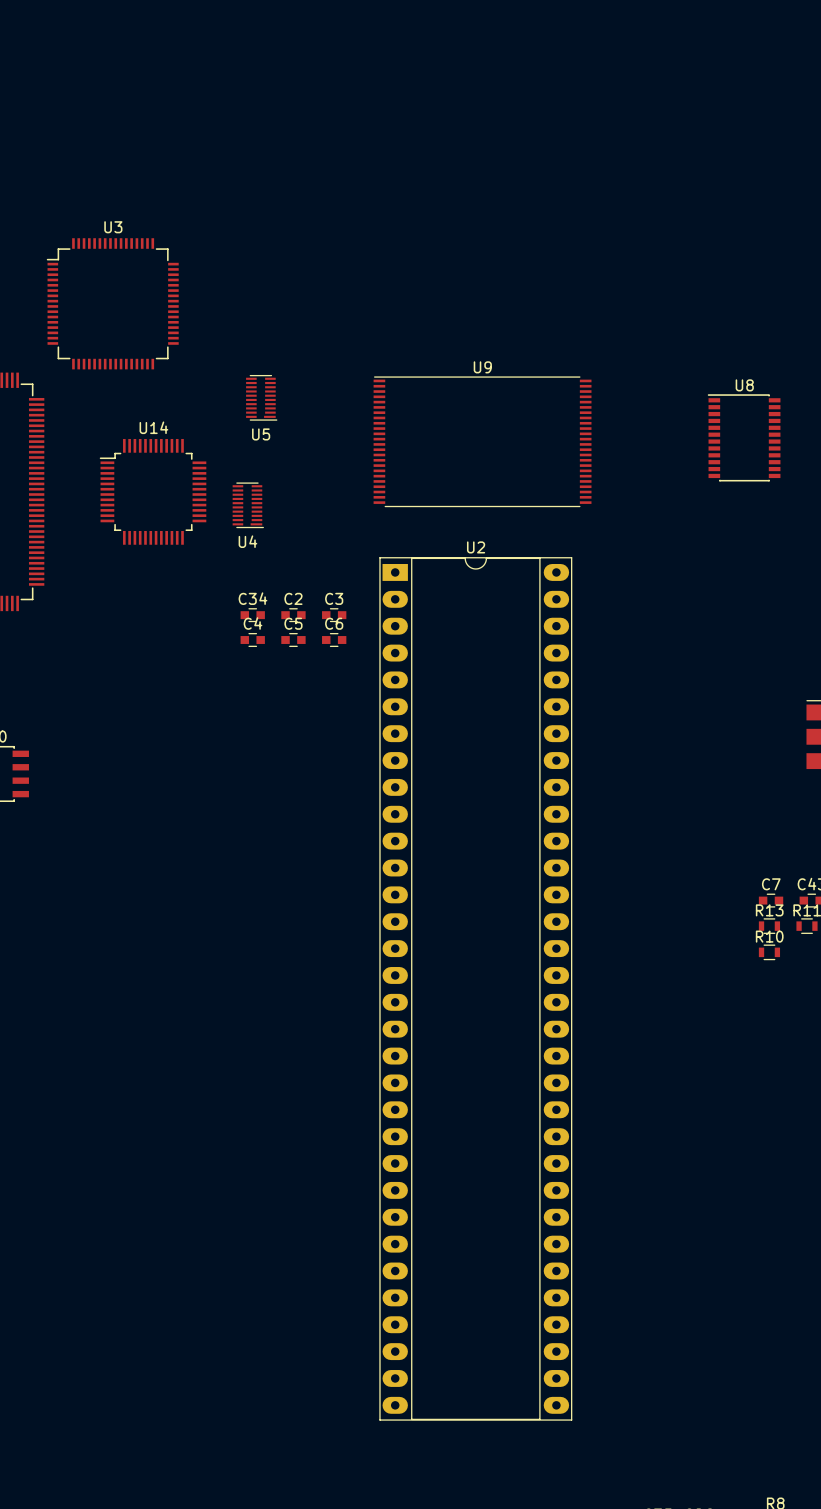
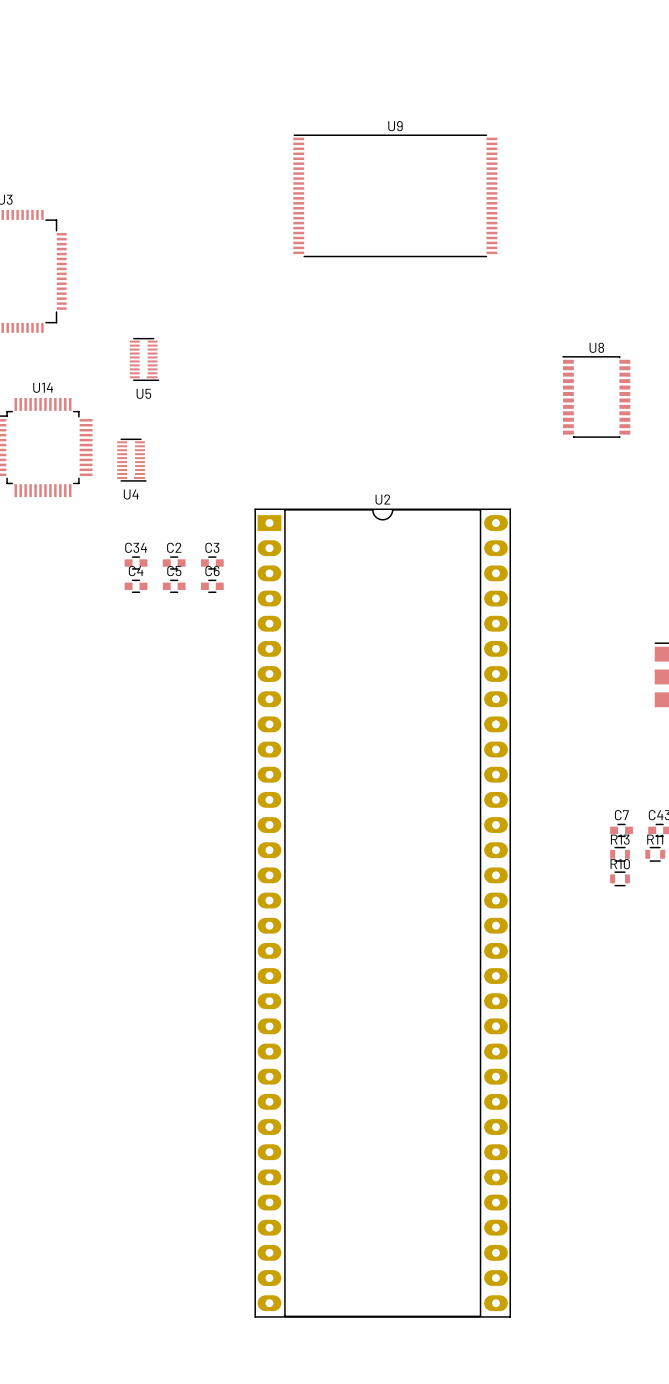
U9 position: (482, 441) -> (395, 195)
U2 footprint: [379, 557, 573, 1421] -> [254, 508, 511, 1318]

